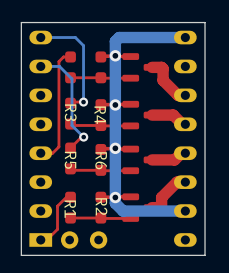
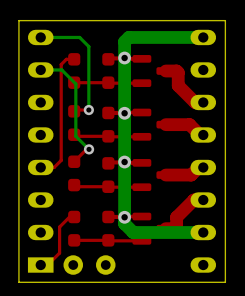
R3 name: R3 (70, 112) -> none
R4 name: R4 (100, 115) -> none
R5 name: R5 (70, 160) -> none
R6 name: R6 (101, 160) -> none
R2 name: R2 (101, 206) -> none
R1 name: R1 (70, 209) -> none

